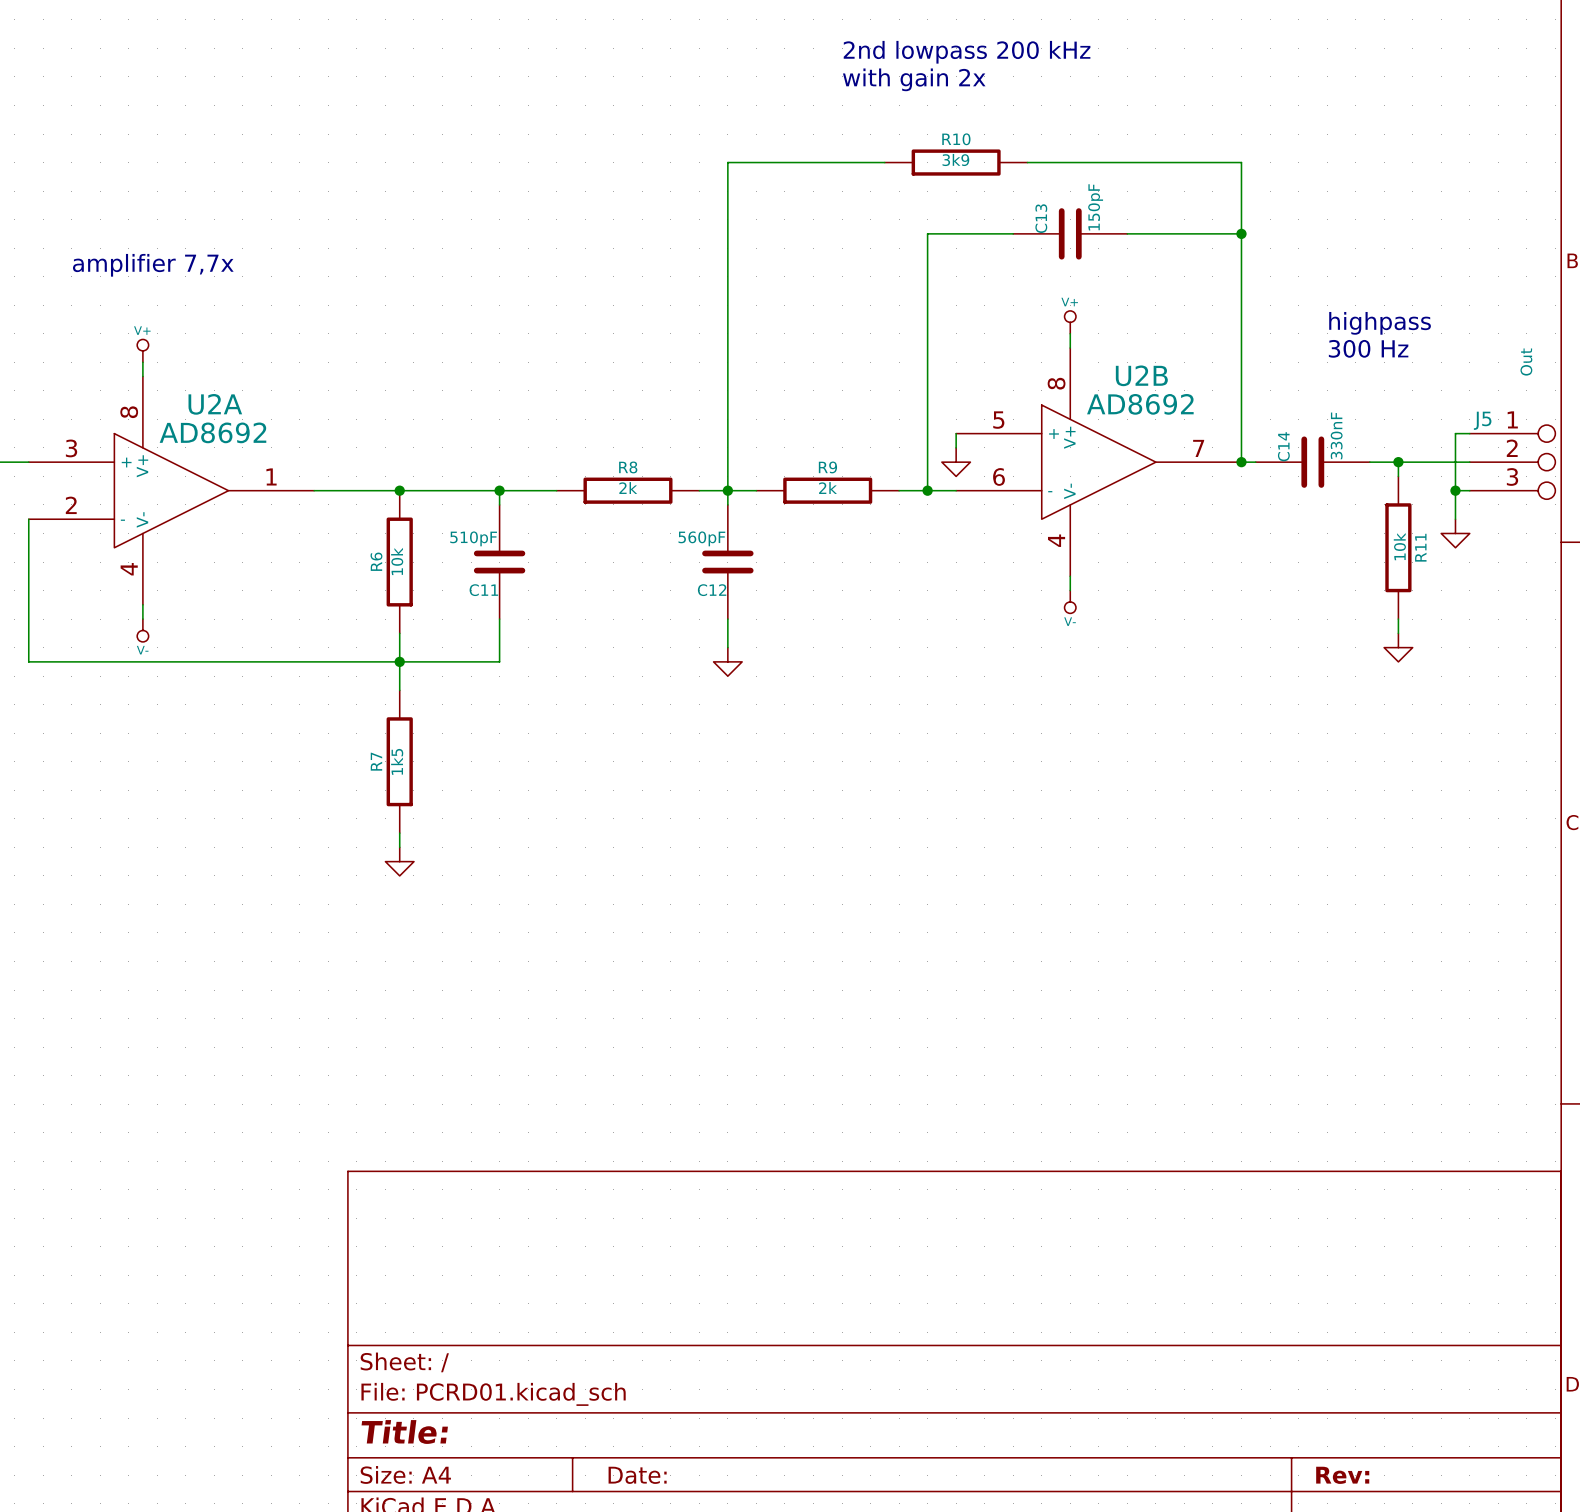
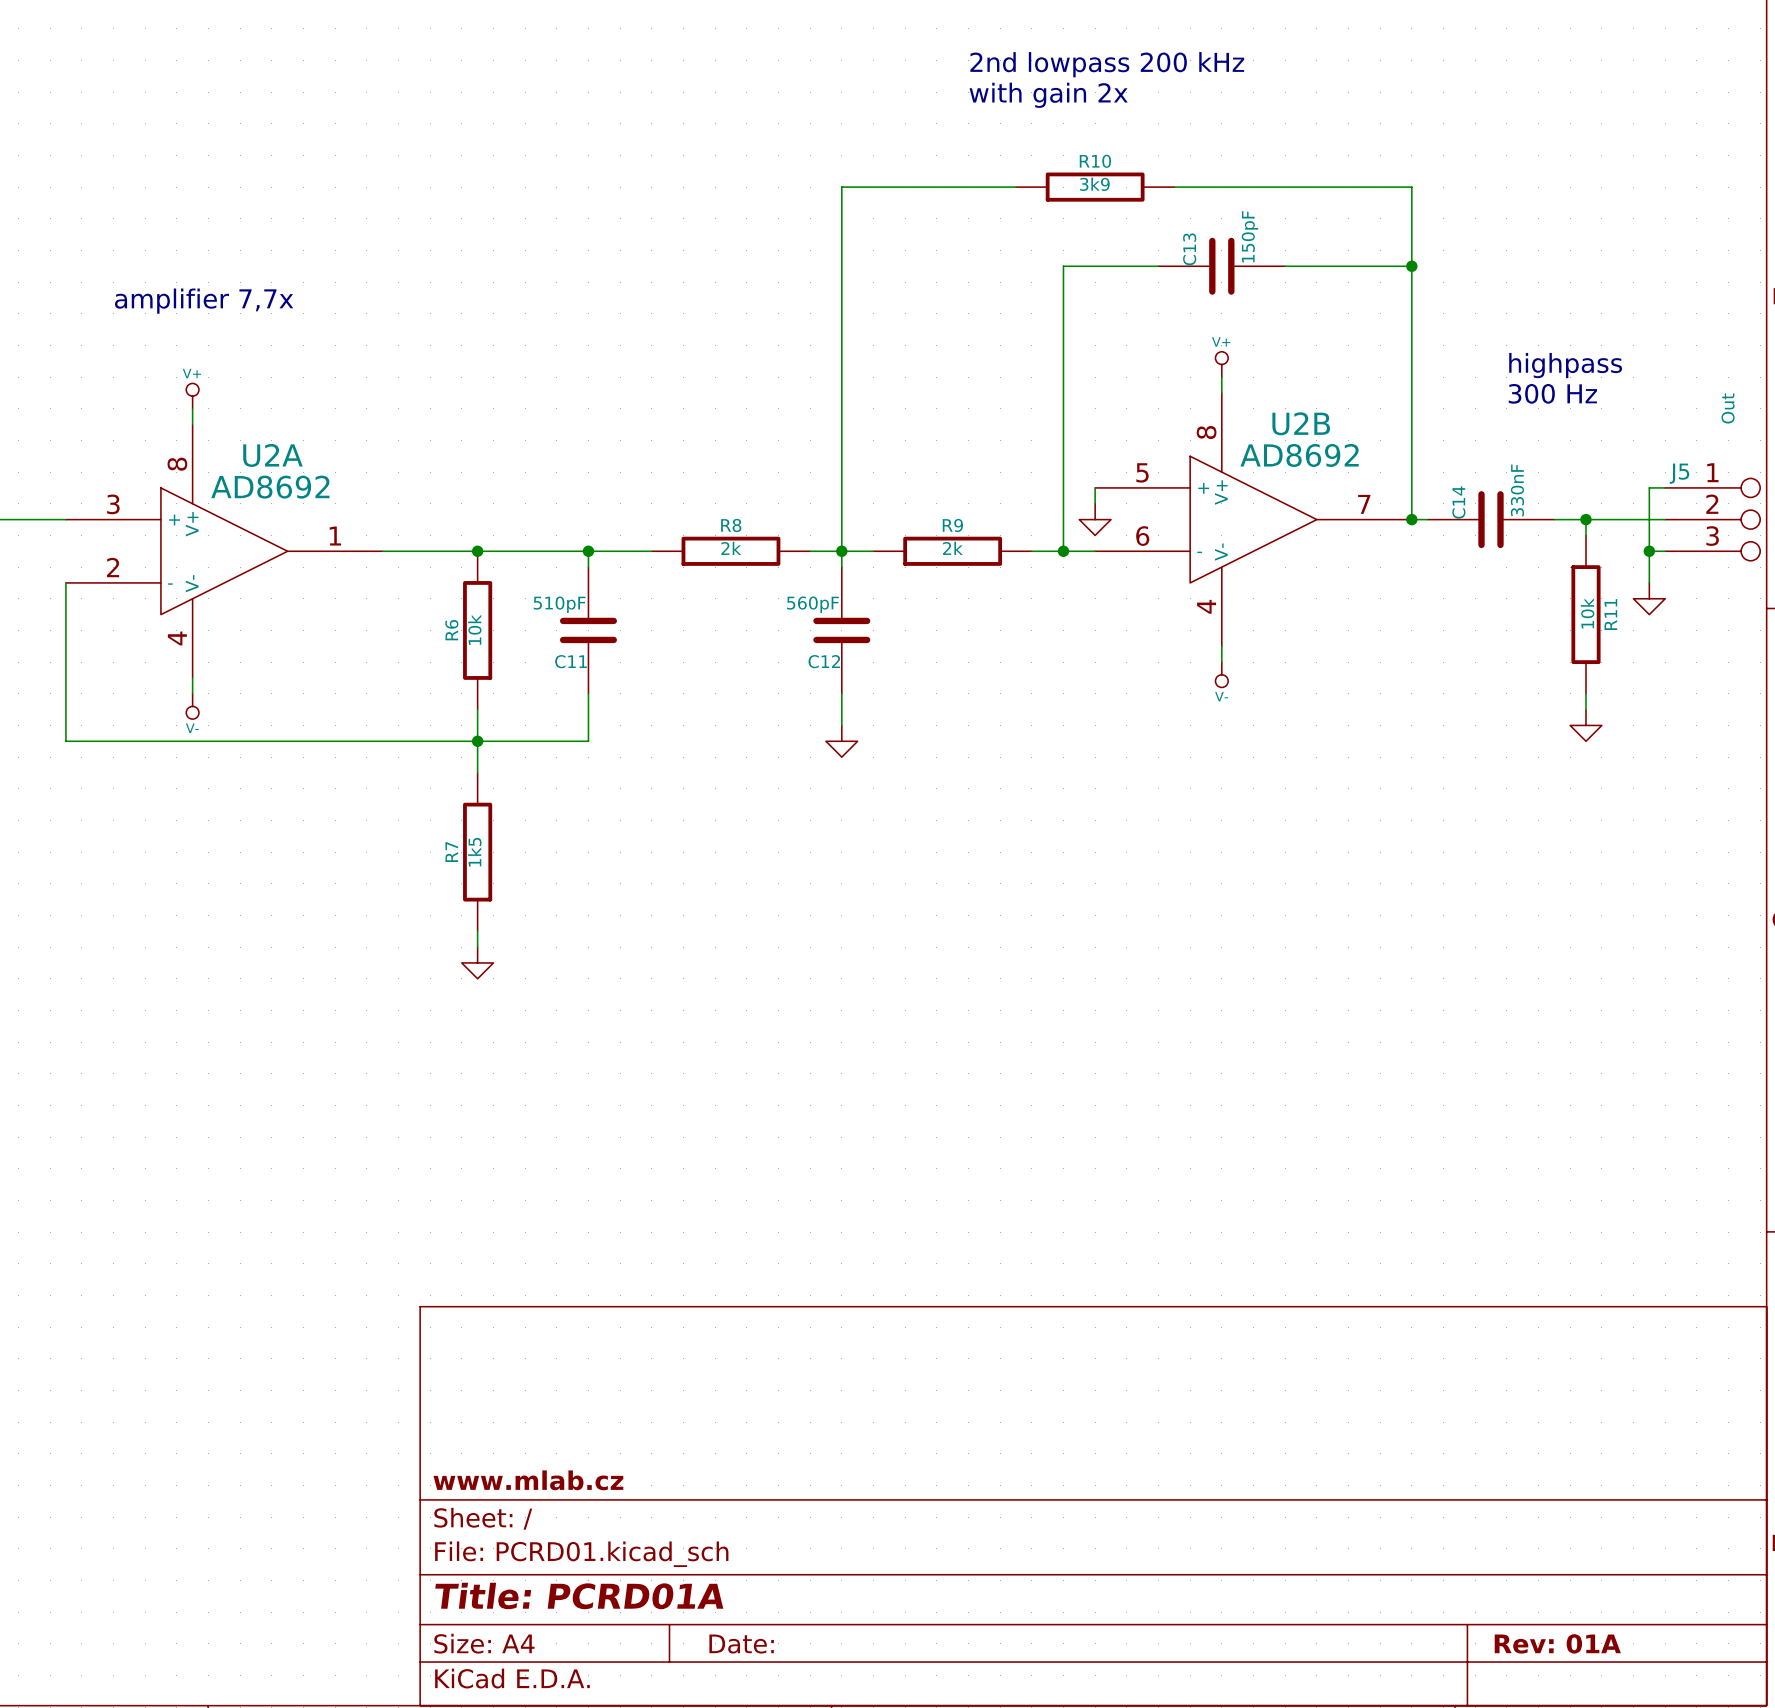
title block: none -> www.mlab.cz (528, 1480)
title block: Title: (404, 1432) -> Title: PCRD01A (579, 1595)
title block: Rev: (1342, 1475) -> Rev: 01A (1557, 1643)

